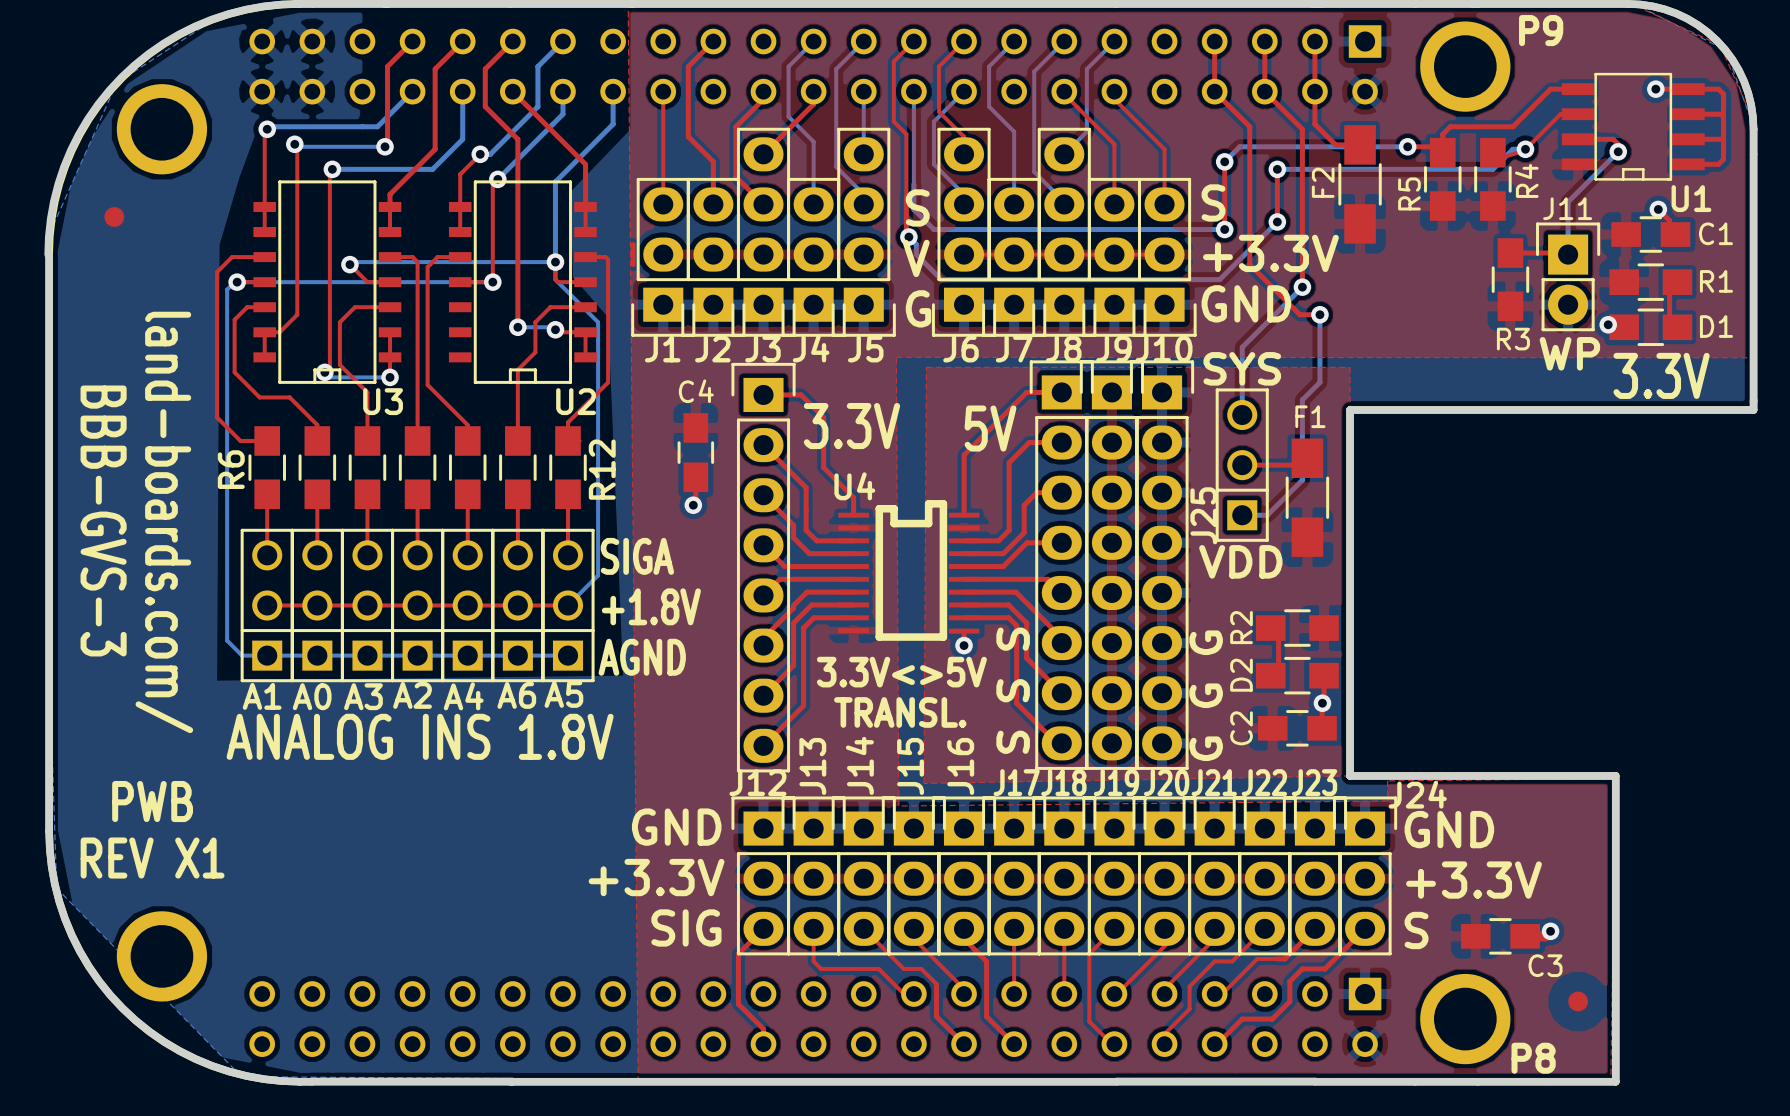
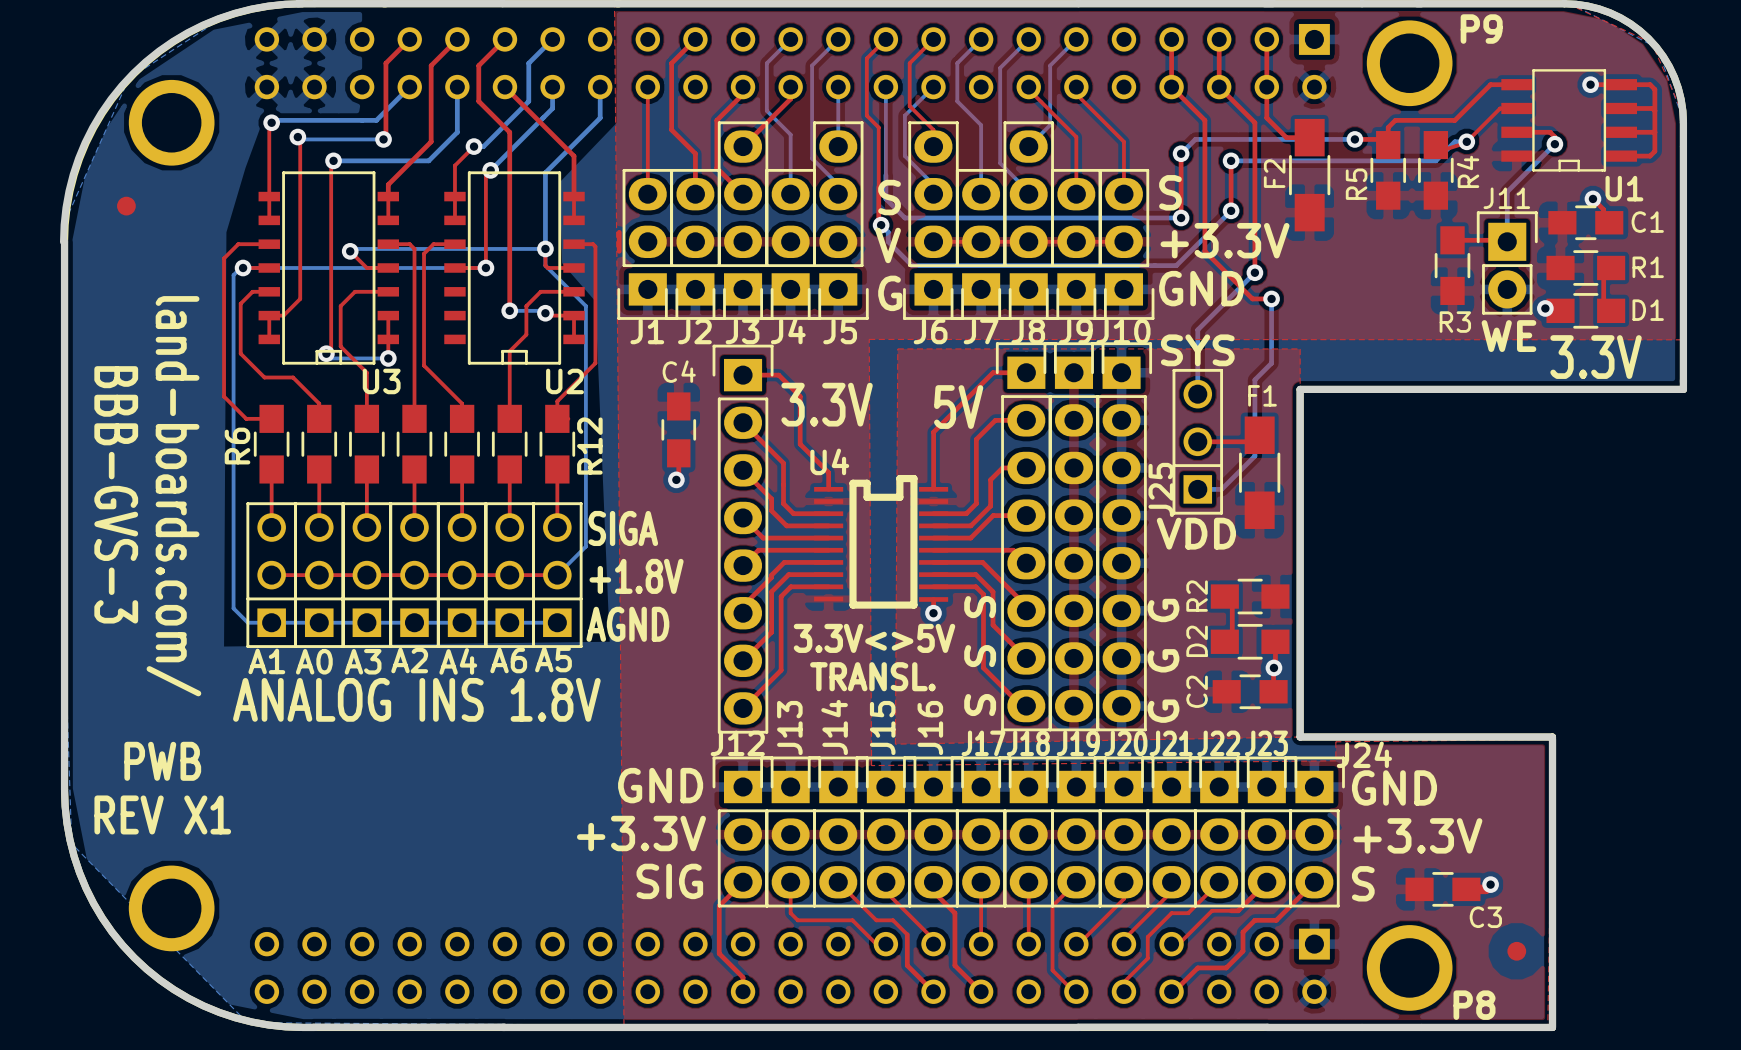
text: WP (1569, 353) -> WE (1508, 336)

